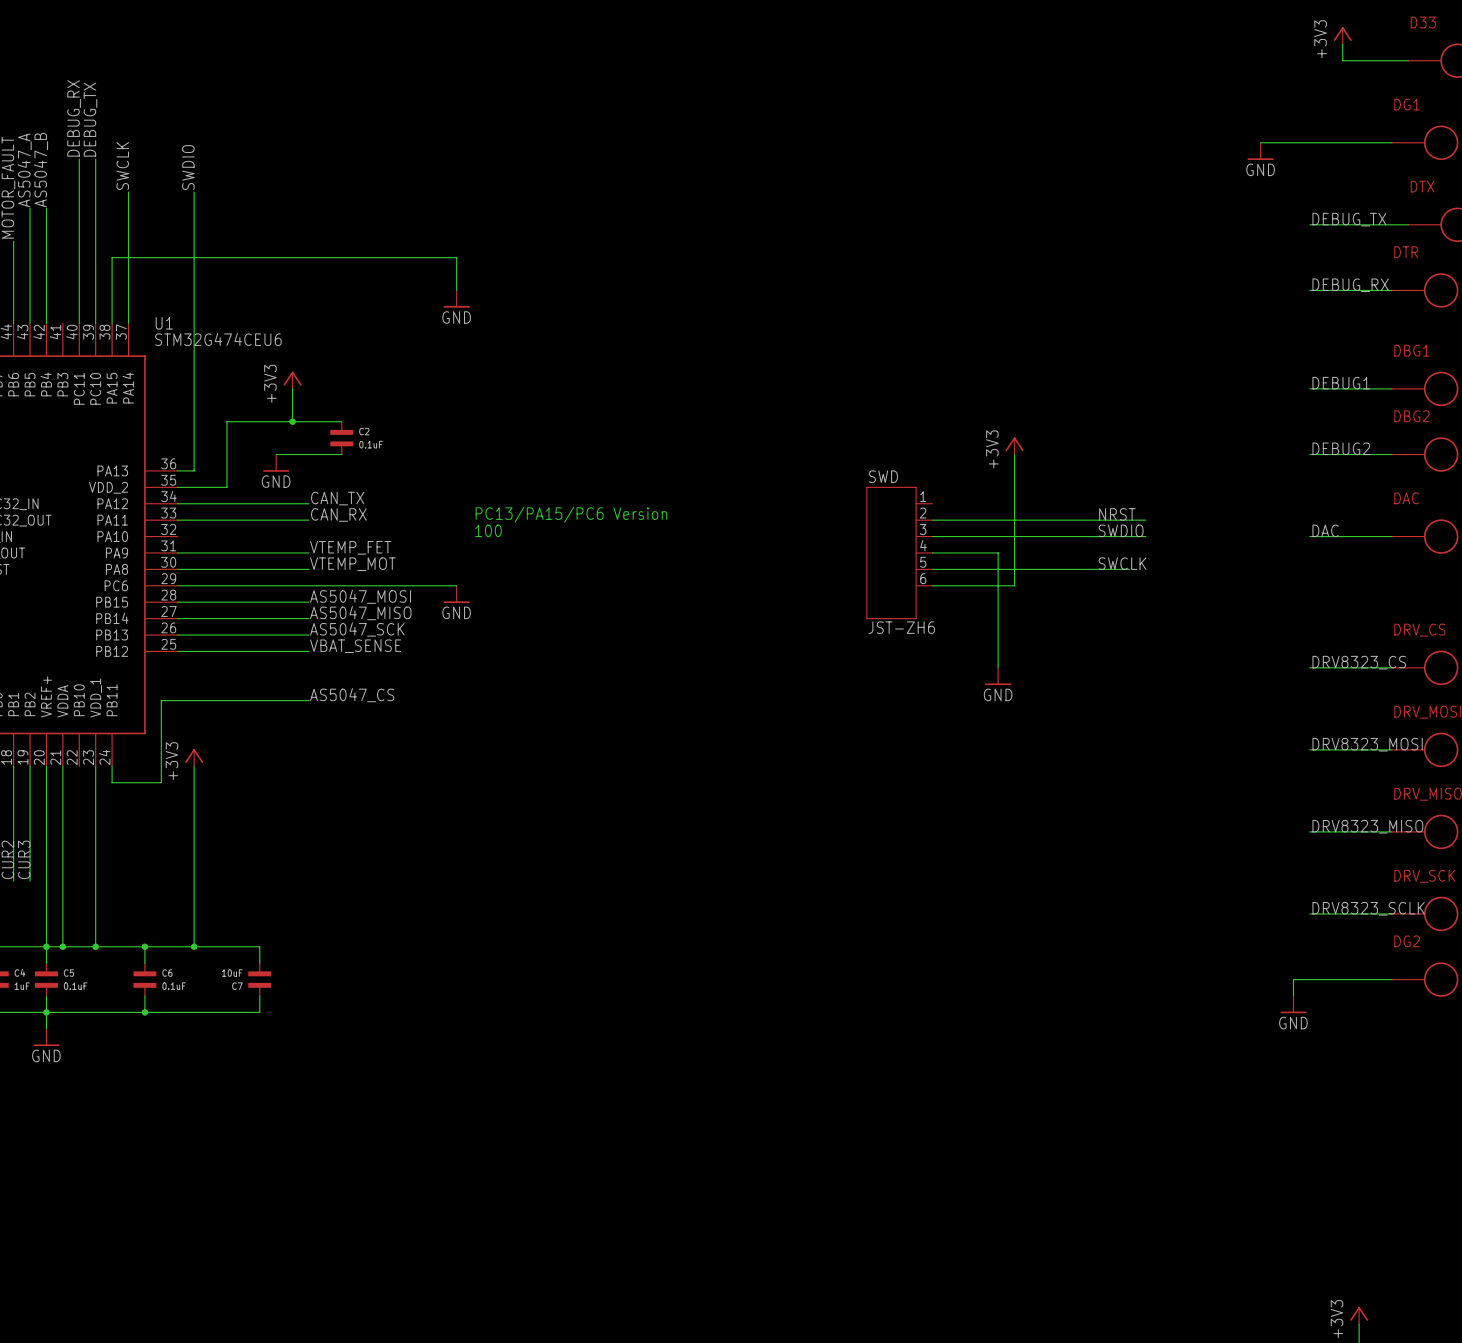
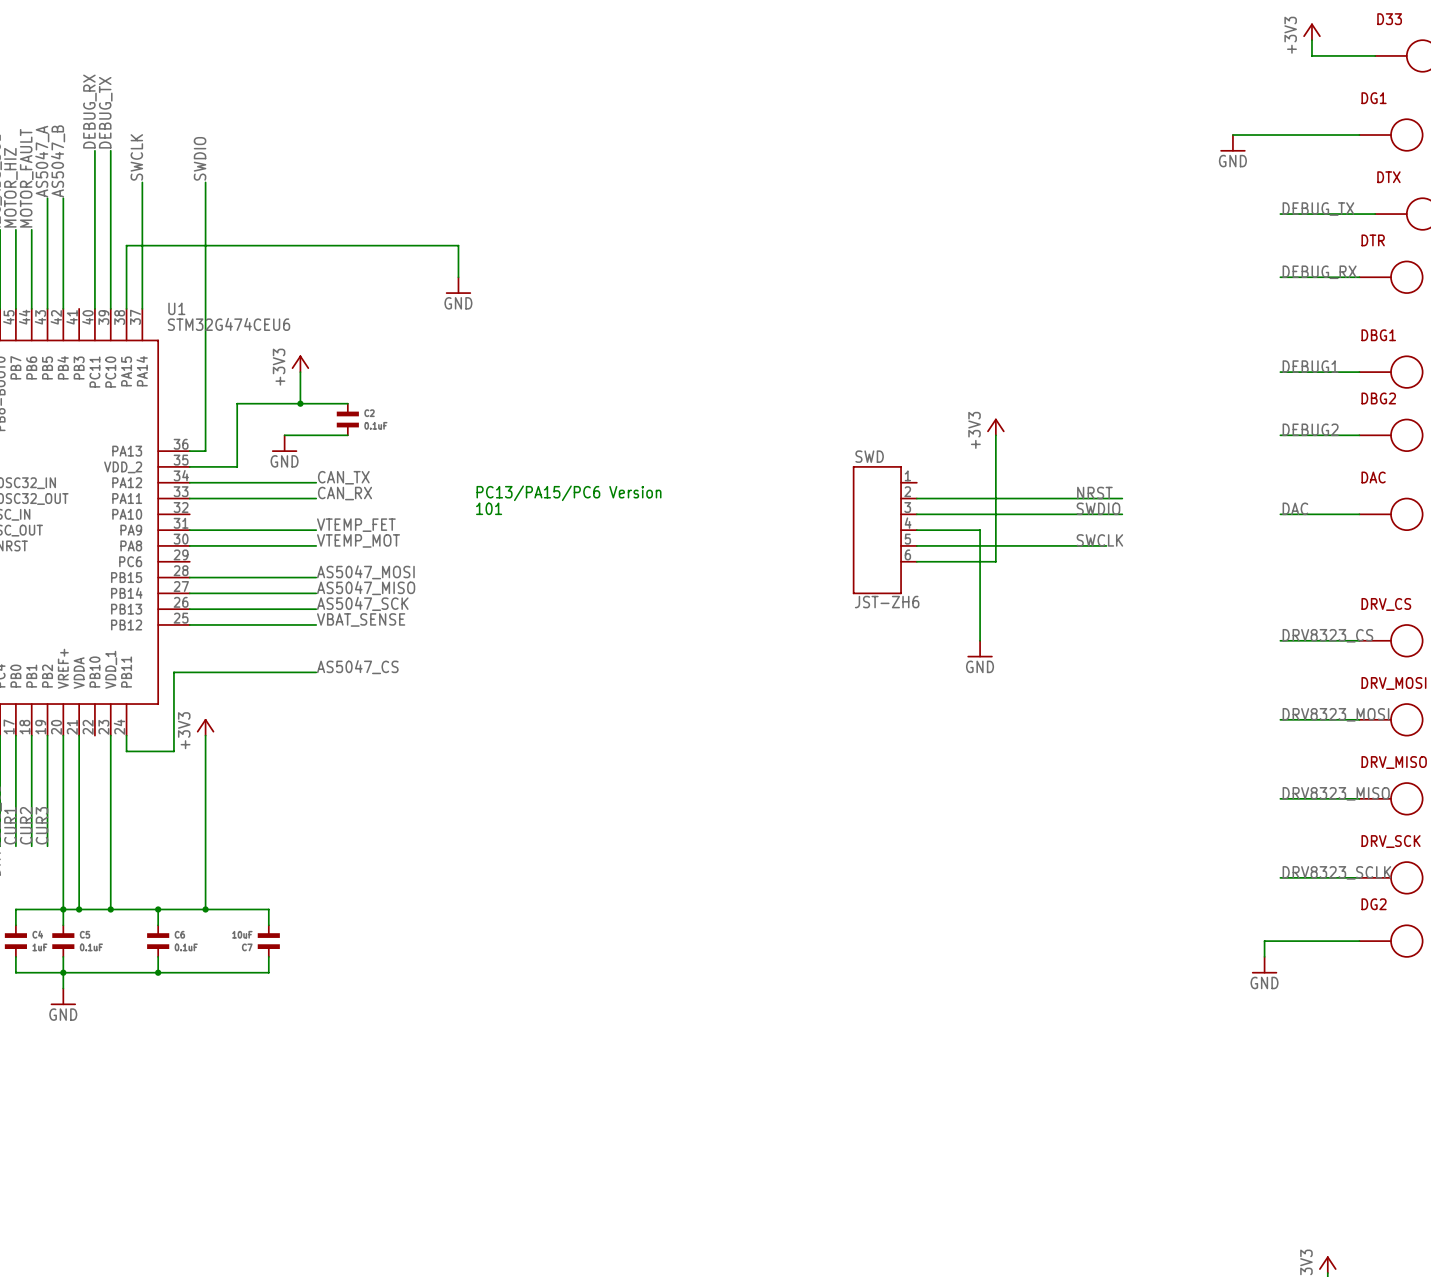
text: 100 (488, 530) -> 101 (489, 508)
wire: (177, 585) (456, 585) -> none
power symbol: GND (456, 594) -> none

